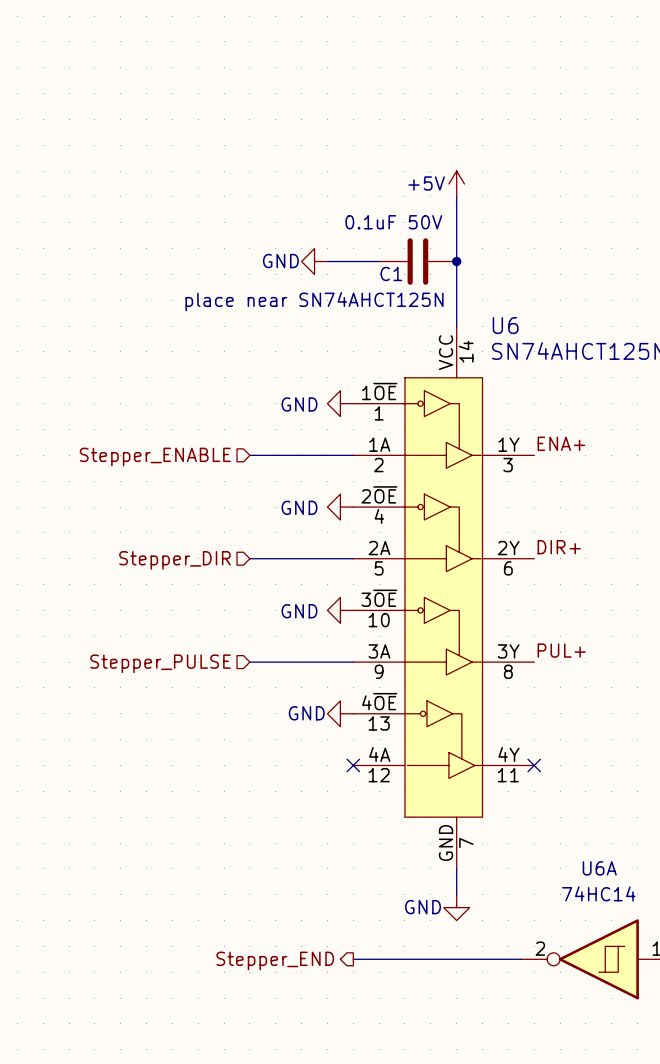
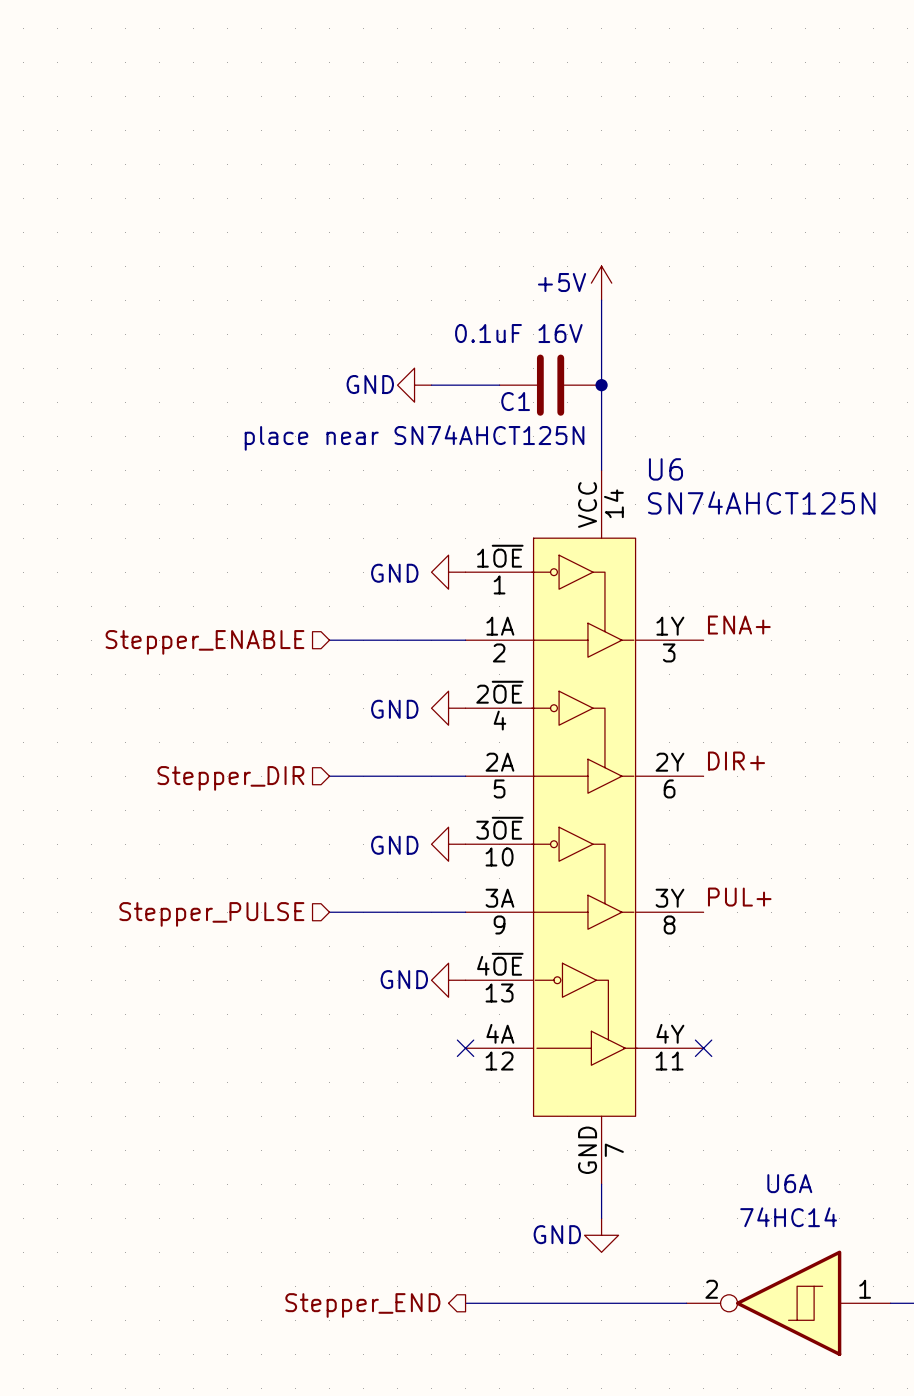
C1 value: 0.1uF 50V (393, 222) -> 0.1uF 16V (518, 333)

